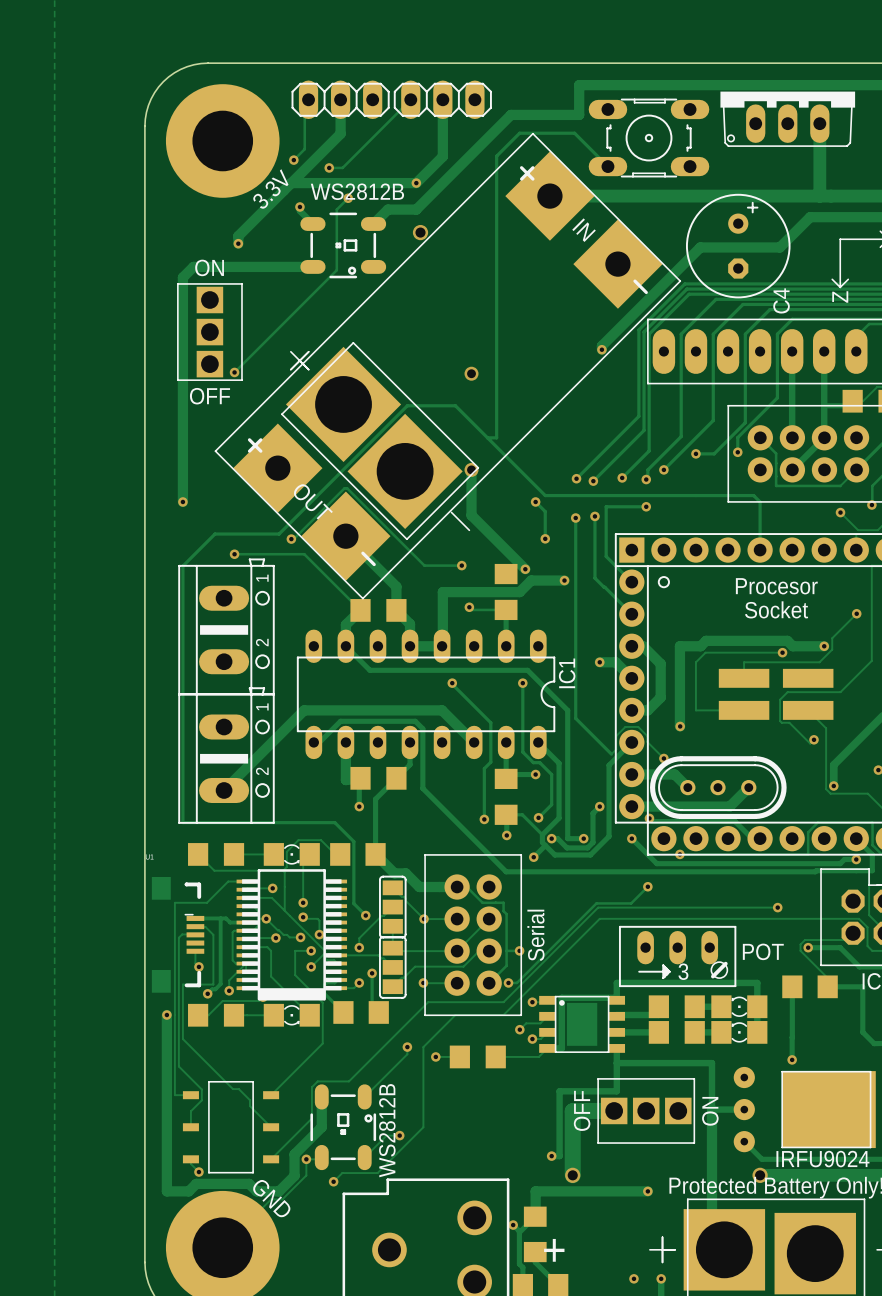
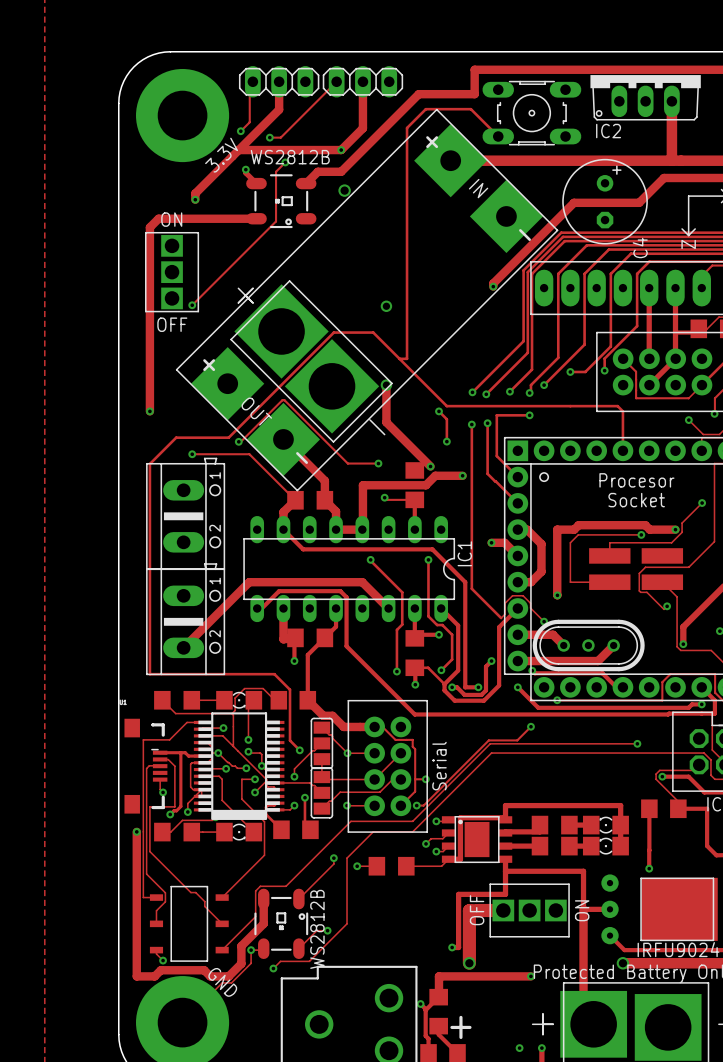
IC2 name: none -> IC2 (608, 131)
track: (545, 845) (533, 857) -> none
via: (533, 857) -> none
POT: (677, 956) -> none

